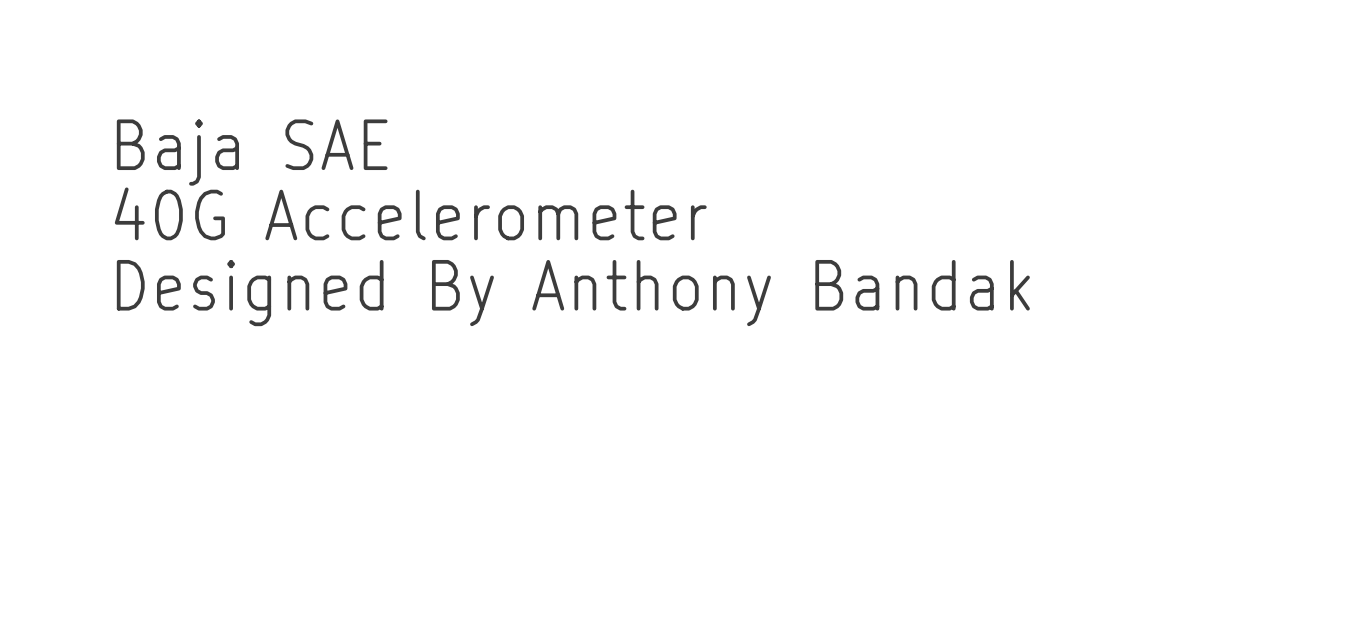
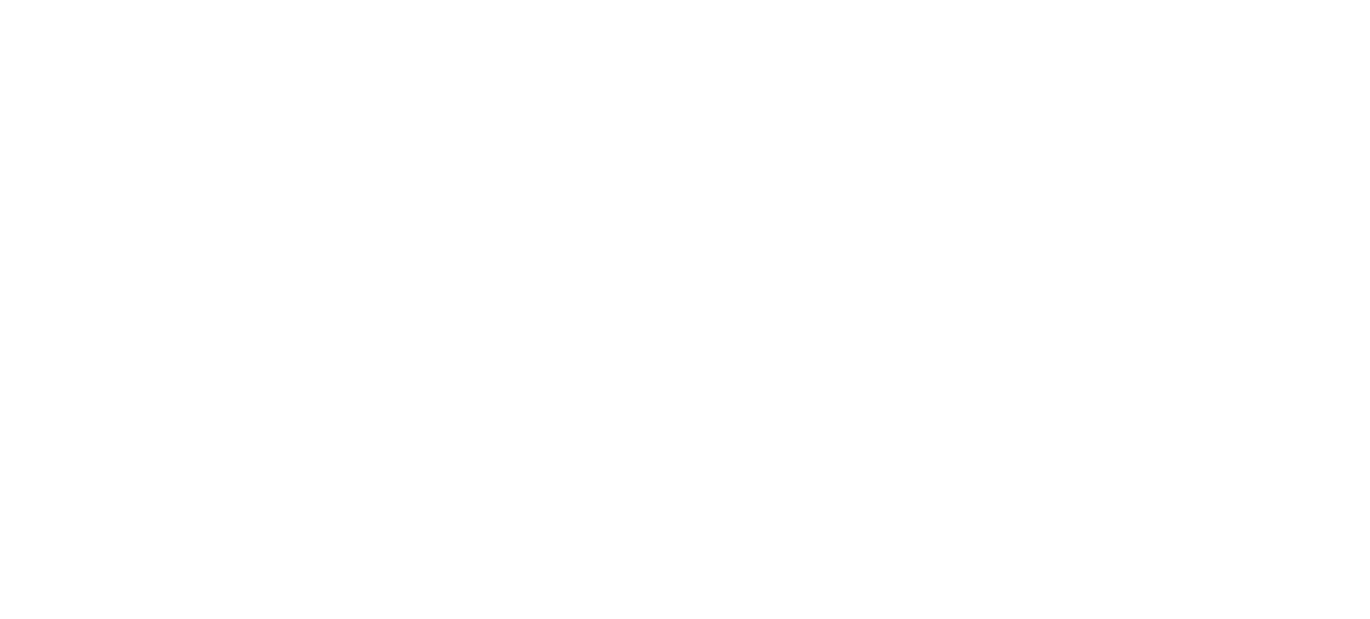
text: Baja SAE (252, 152) -> none
text: 40G Accelerometer (410, 213) -> none
text: Designed By Anthony Bandak (573, 293) -> none

